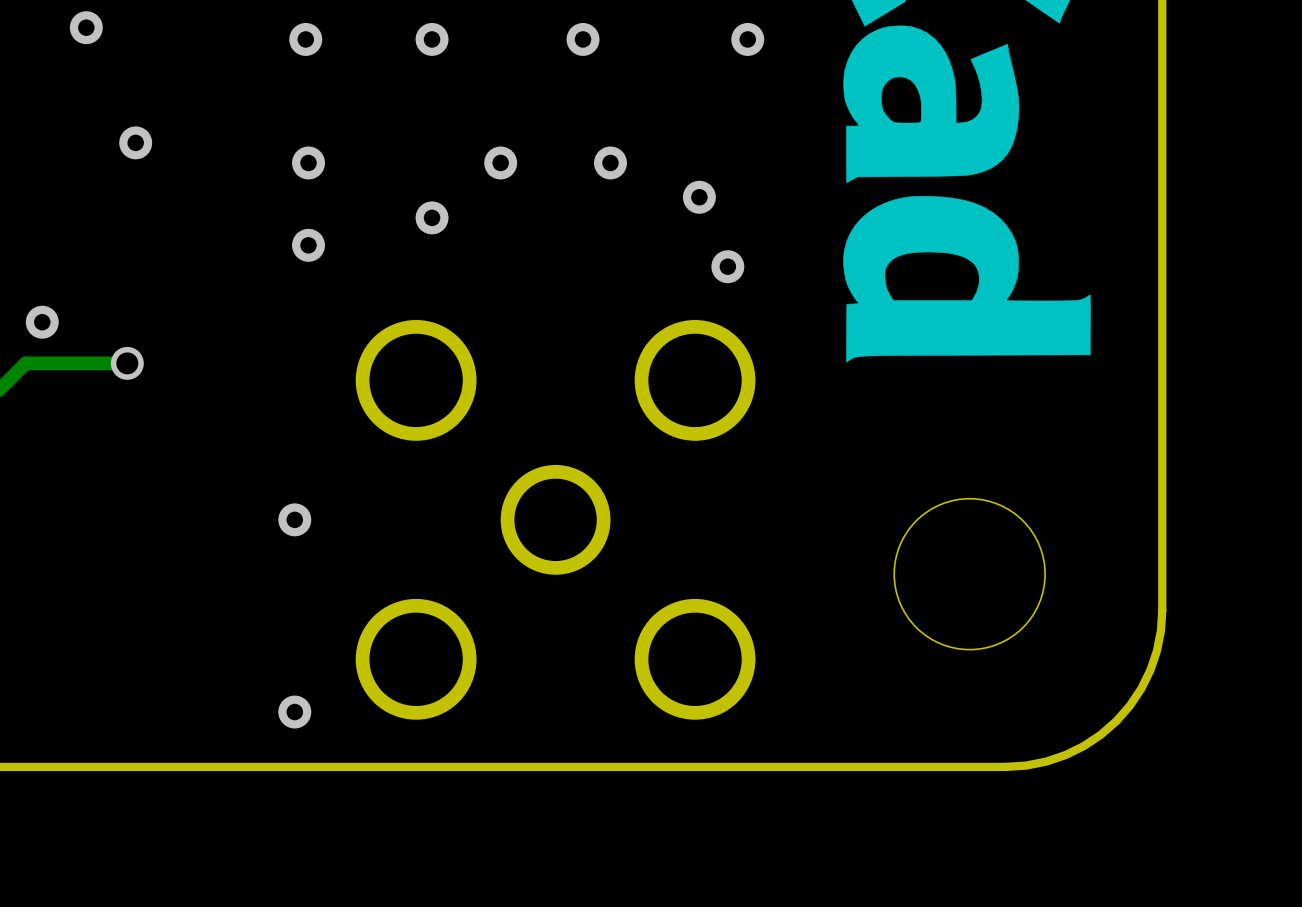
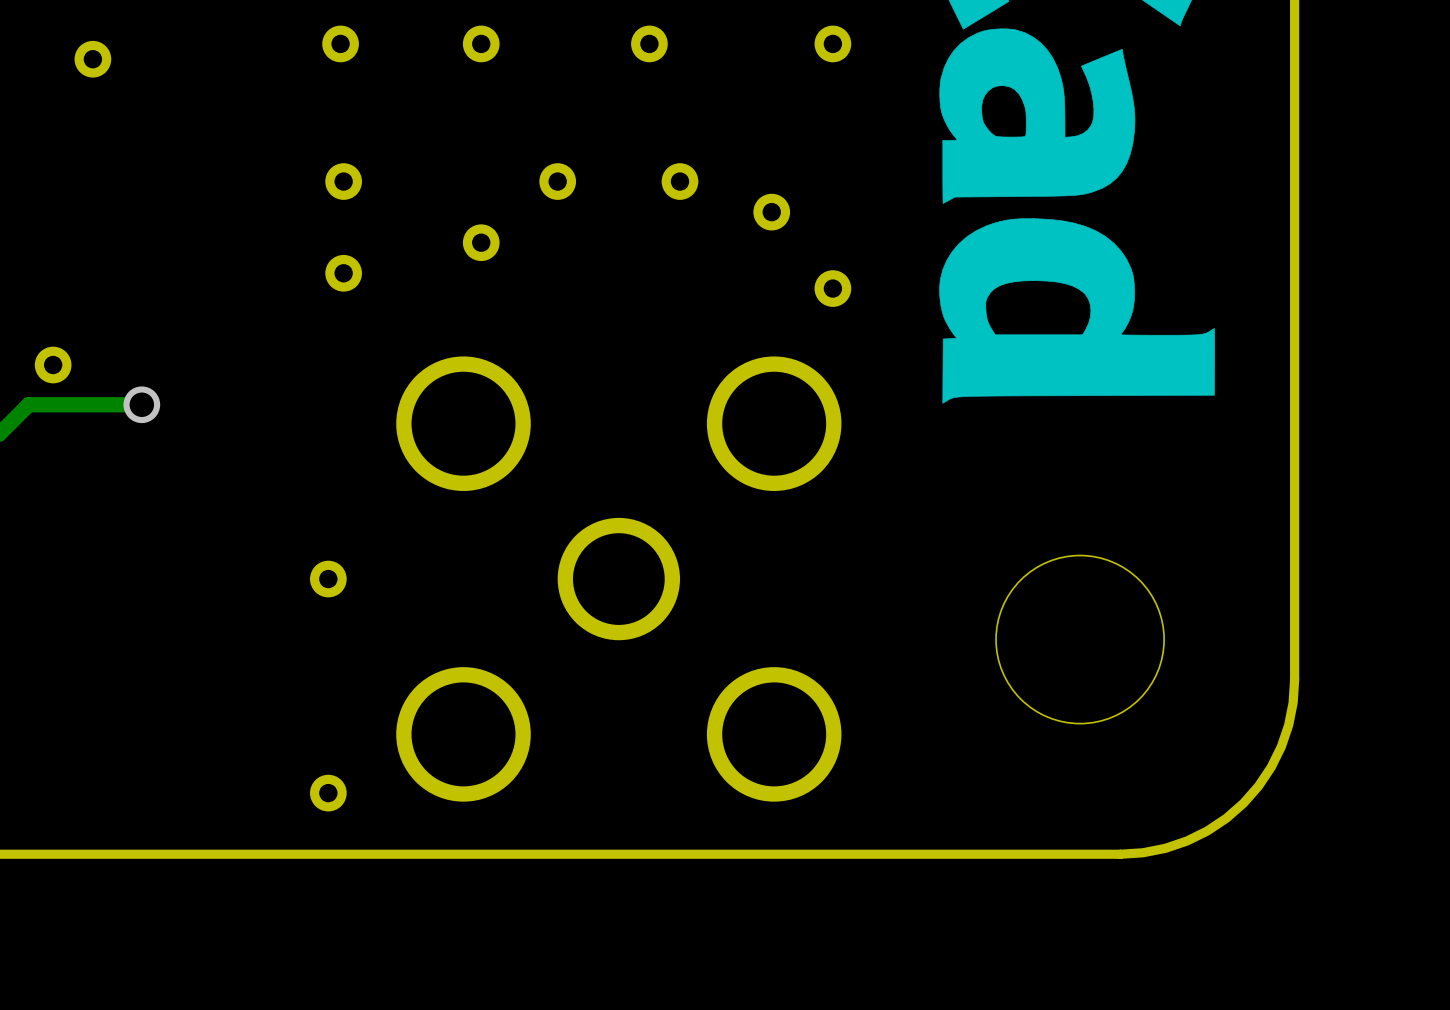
via: (86, 27) -> none
part: none -> (340, 43)
via: (305, 39) -> none
part: none -> (481, 43)
via: (432, 39) -> none
part: none -> (649, 43)
via: (583, 39) -> none
part: none -> (832, 43)
via: (747, 39) -> none
part: none -> (92, 59)
via: (135, 142) -> none
part: none -> (343, 181)
via: (308, 162) -> none
part: none -> (557, 181)
via: (500, 162) -> none
part: none -> (680, 181)
via: (610, 162) -> none
part: none -> (771, 212)
via: (699, 197) -> none
part: none -> (481, 242)
via: (432, 217) -> none
part: none -> (343, 273)
via: (308, 245) -> none
part: none -> (832, 288)
via: (727, 266) -> none
via: (42, 322) -> none
part: none -> (53, 365)
part: none -> (328, 579)
via: (294, 519) -> none
part: none -> (328, 793)
via: (294, 712) -> none

